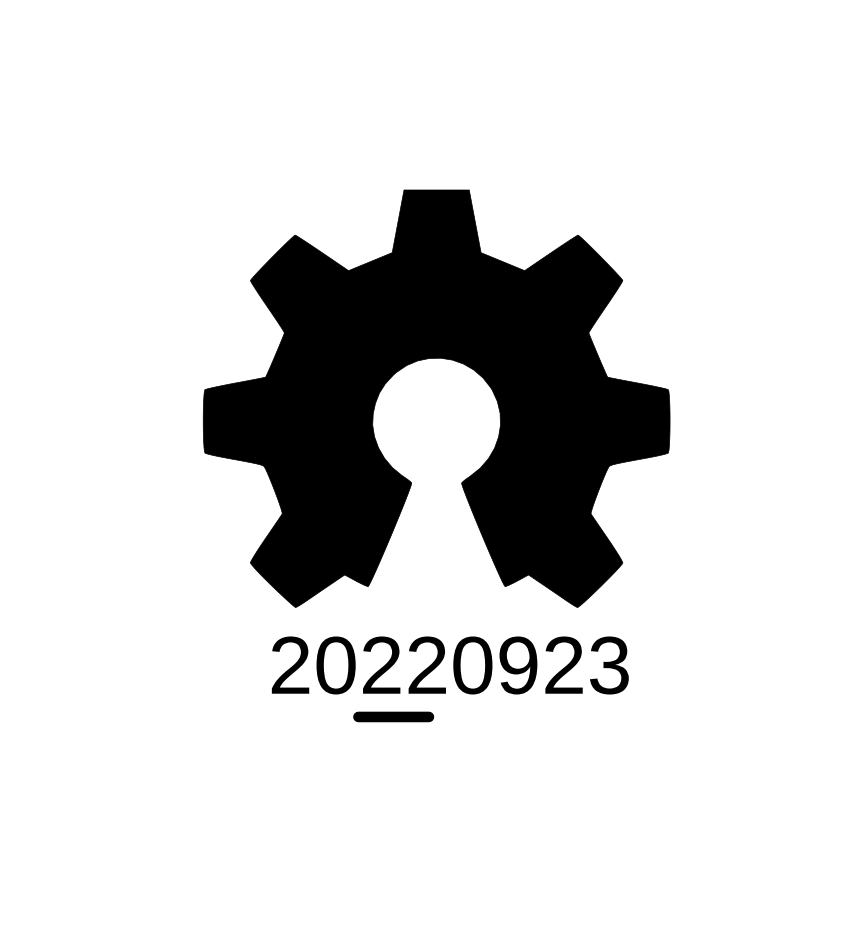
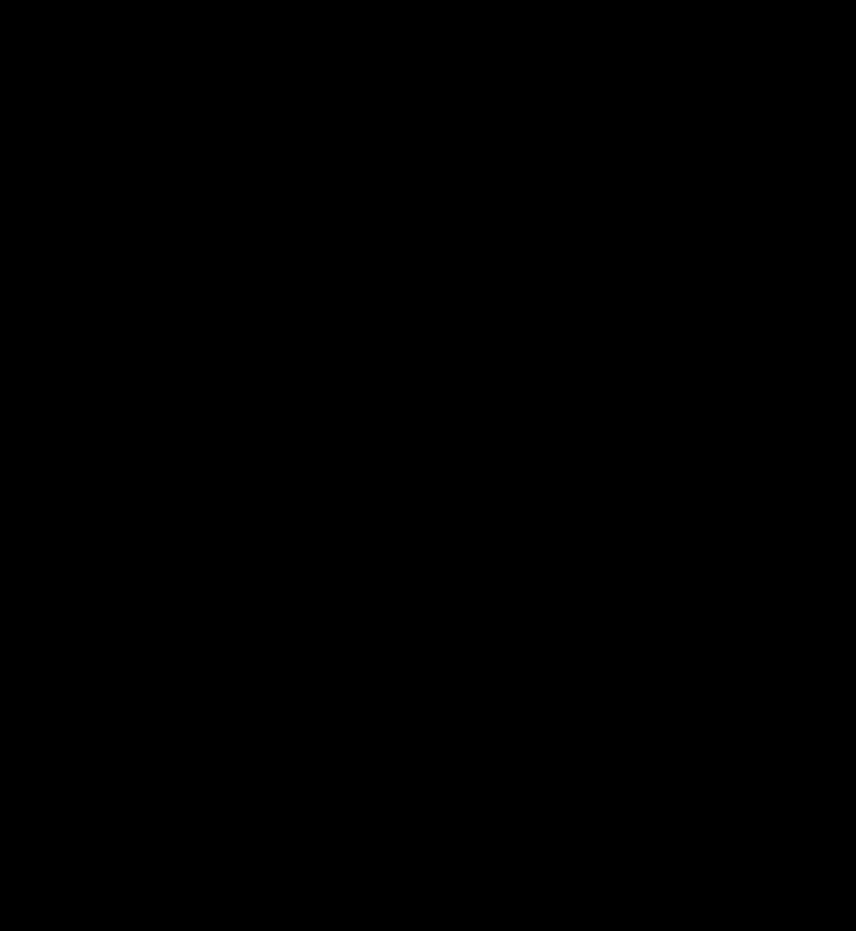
drawing: [202, 189, 671, 723] -> none

